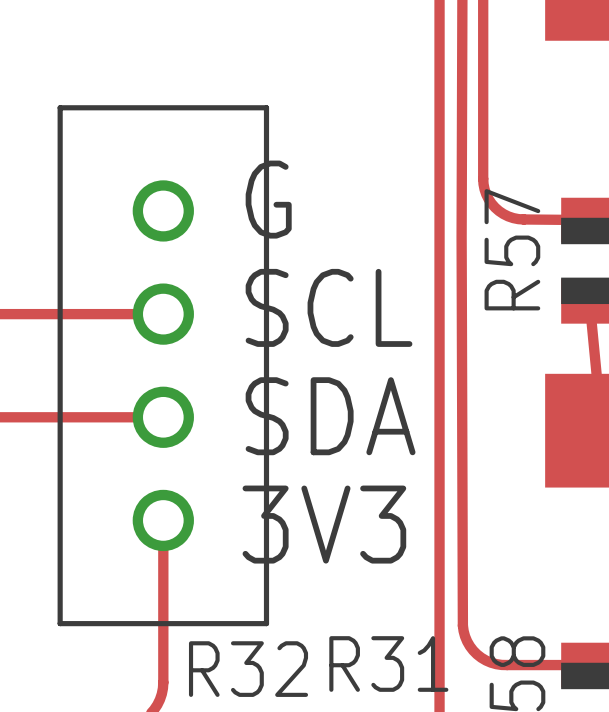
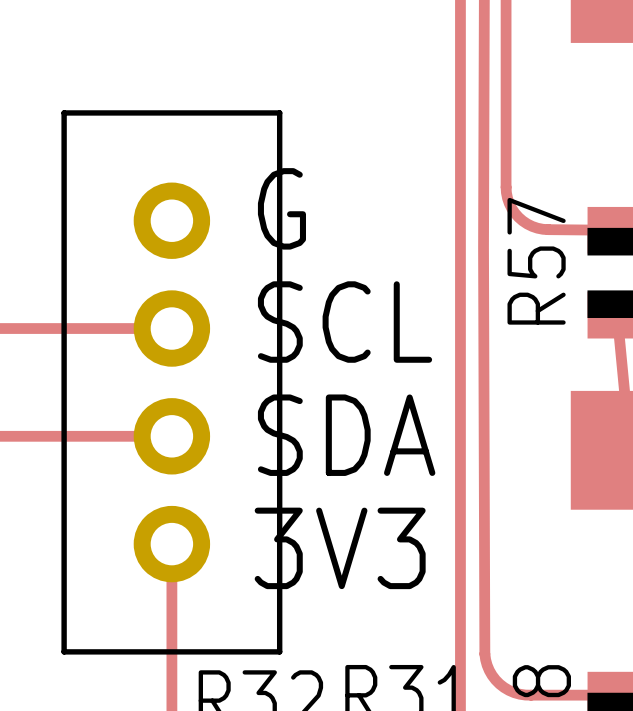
part footprint: [57, 105, 270, 627] -> [61, 110, 283, 655]

